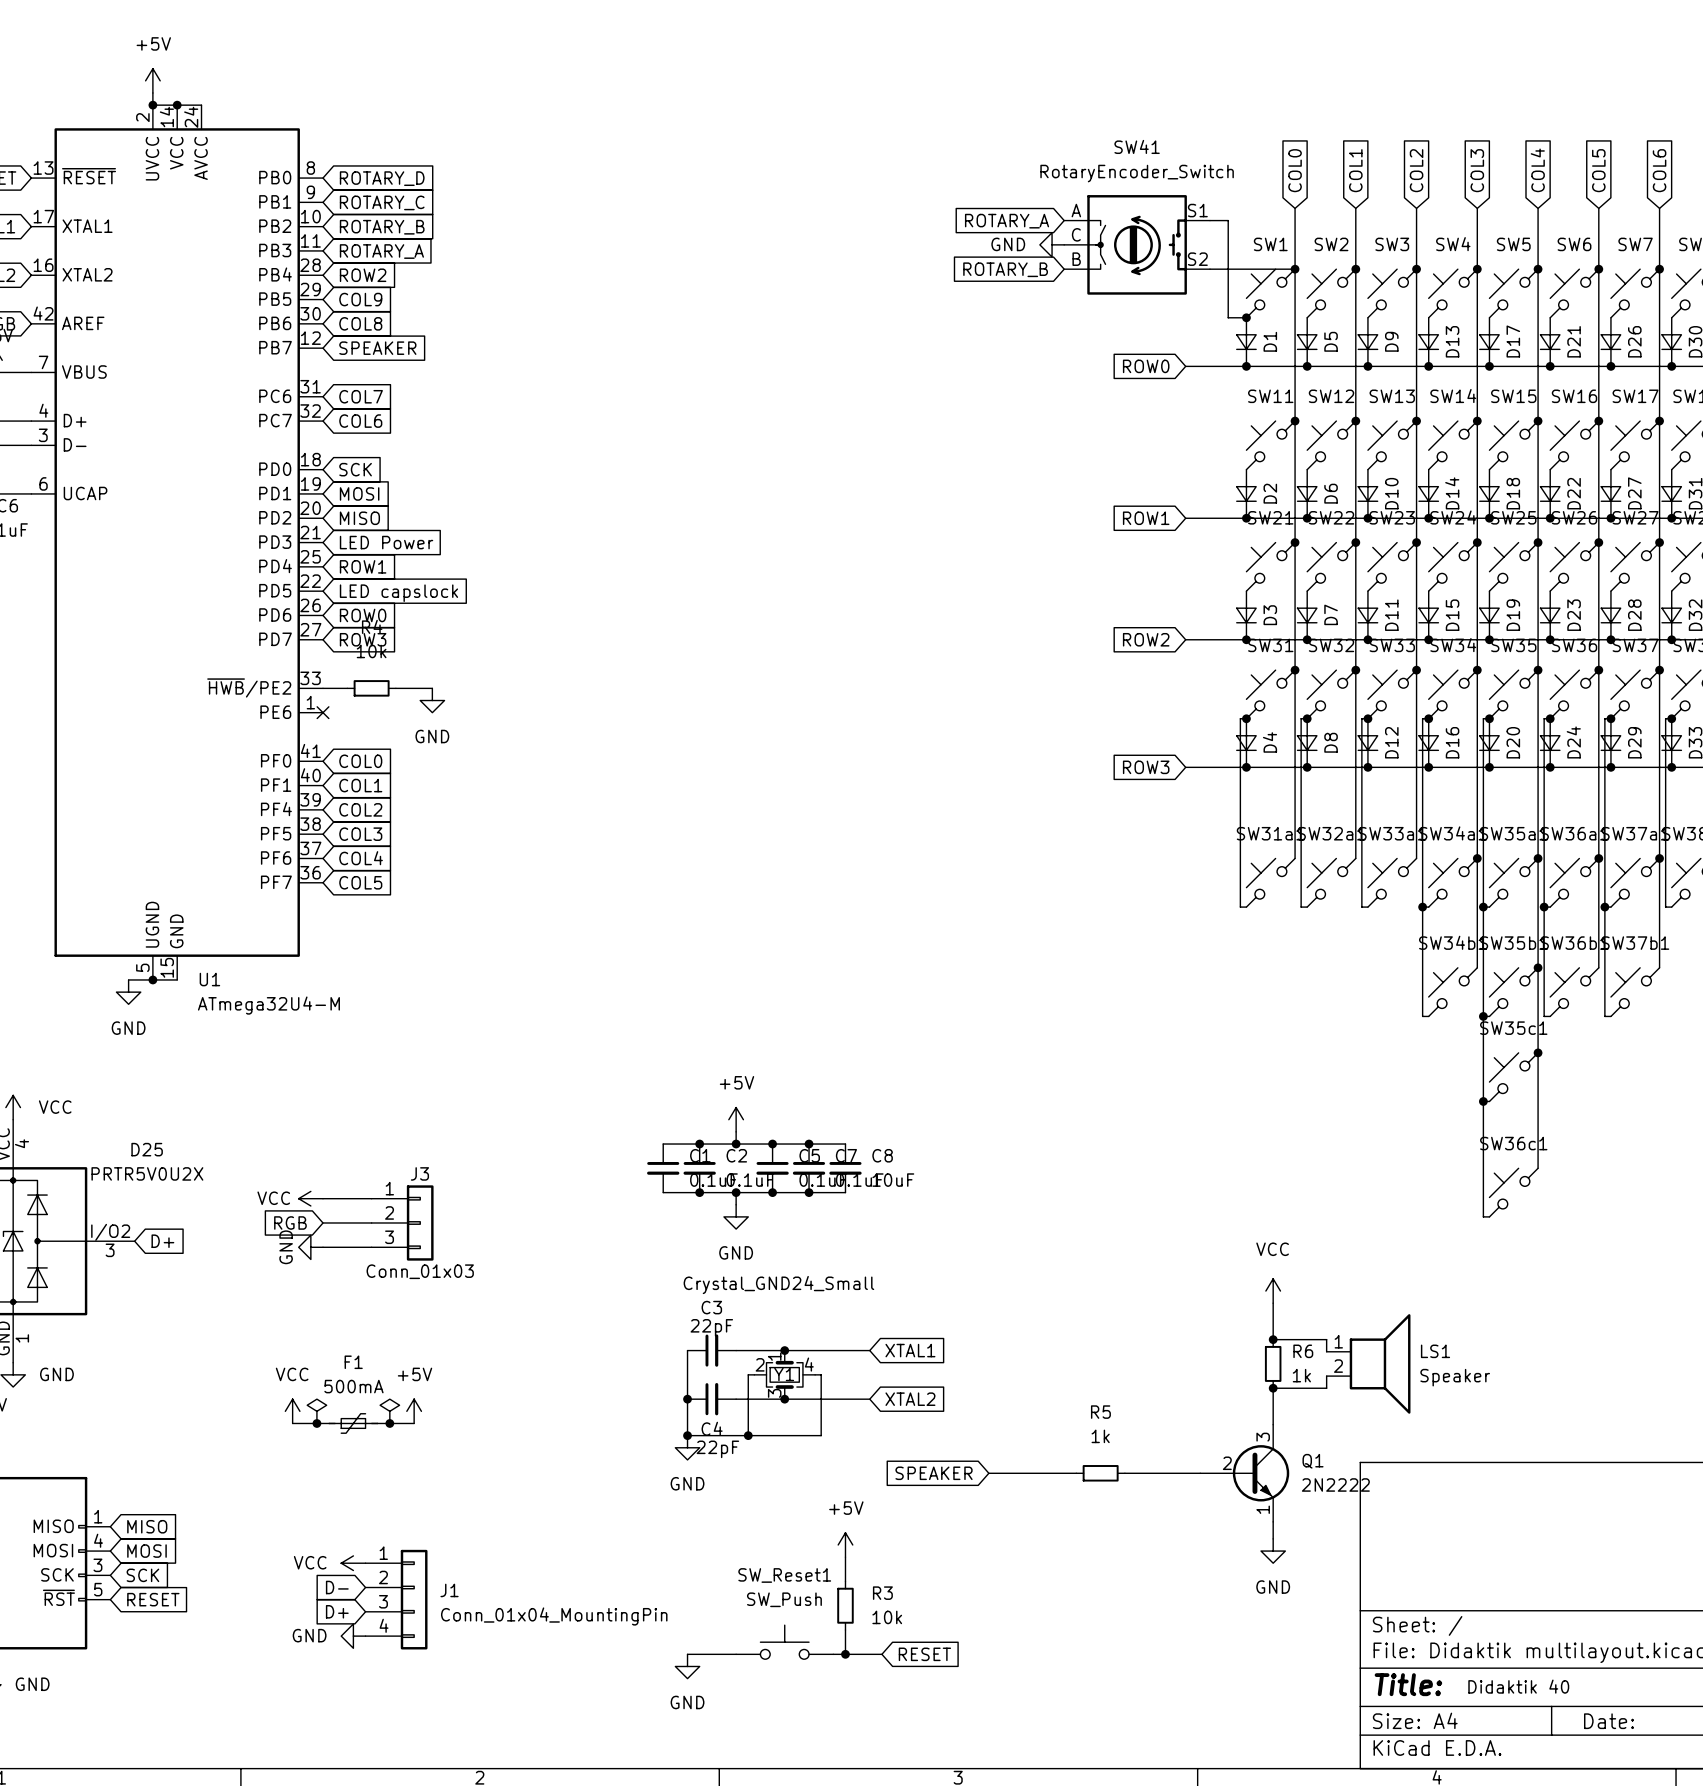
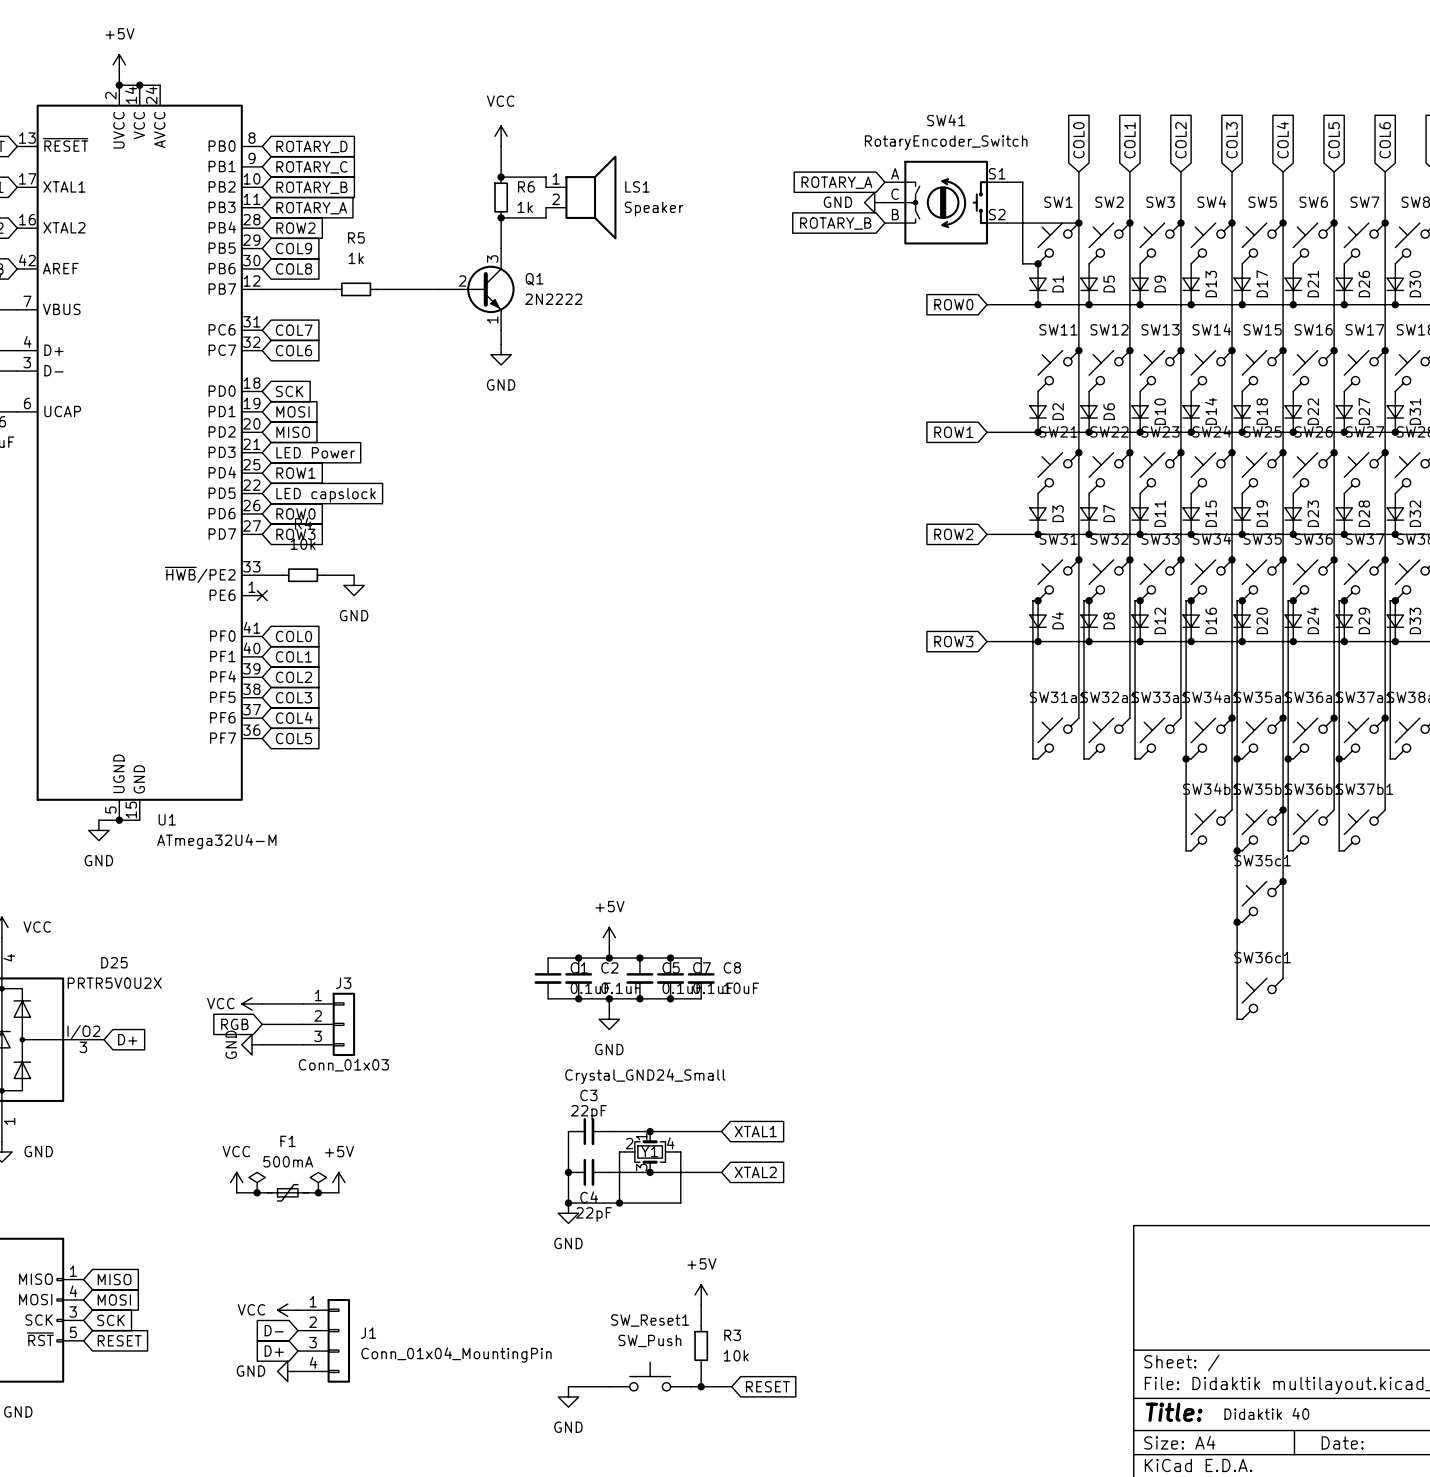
power symbol: none -> VCC (501, 136)
wire: none -> (501, 146) (501, 177) (546, 177) (546, 187)
junction: none -> (501, 177)
wire: none -> (546, 207) (546, 217) (501, 217) (501, 248)
junction: none -> (501, 217)
wire: none -> (262, 289) (335, 289)
global label: SPEAKER (377, 348) -> none
wire: none -> (376, 289) (439, 289)
wire: none -> (501, 330) (501, 344)
power symbol: none -> GND (501, 354)
power symbol: VCC (1273, 1291) -> none
wire: (1273, 1303) (1273, 1339) (1326, 1339) (1326, 1351) -> none
junction: (1273, 1339) -> none
R6 position: (1273, 1363) -> (501, 197)
LS1 position: (1368, 1363) -> (581, 197)
wire: (1326, 1376) (1326, 1388) (1273, 1388) (1273, 1424) -> none
junction: (1273, 1388) -> none
global label: SPEAKER (934, 1473) -> none
wire: (988, 1473) (1076, 1473) -> none
R5 position: (1100, 1473) -> (356, 289)
wire: (1124, 1473) (1200, 1473) -> none
Q1 position: (1244, 1473) -> (477, 289)
wire: (1273, 1521) (1273, 1538) -> none
power symbol: GND (1273, 1551) -> none

